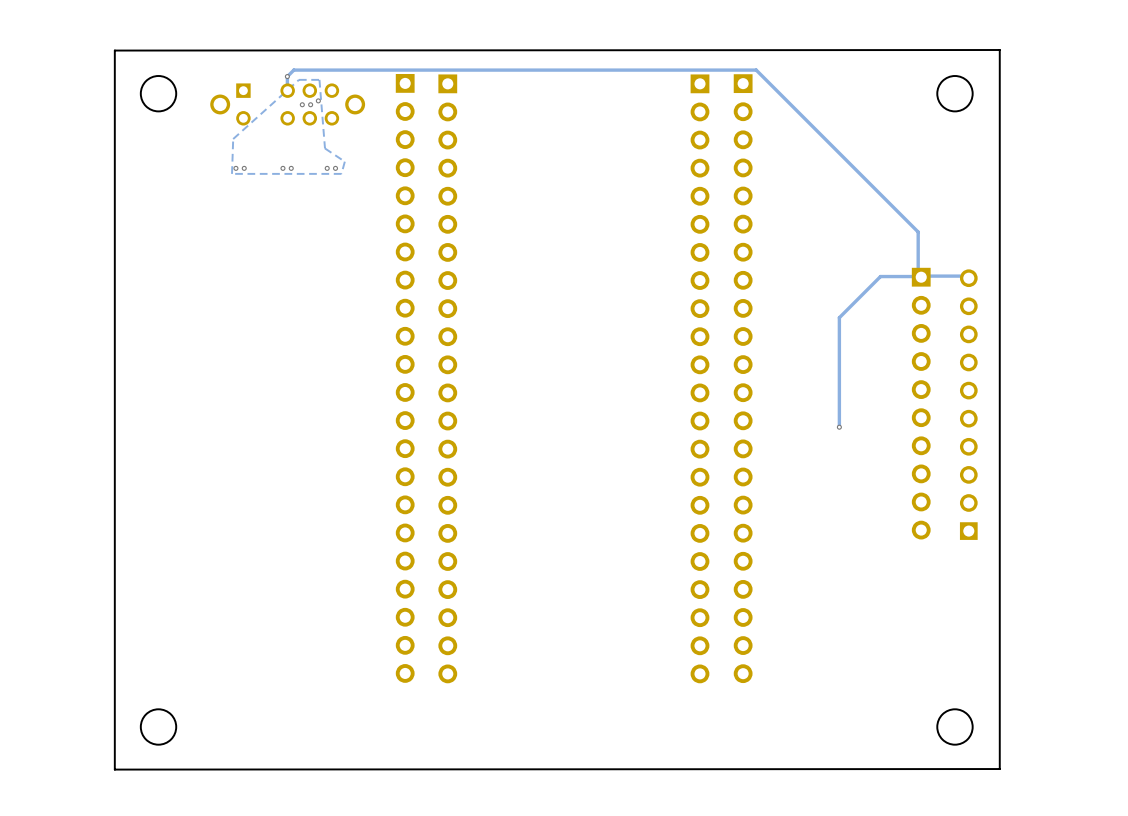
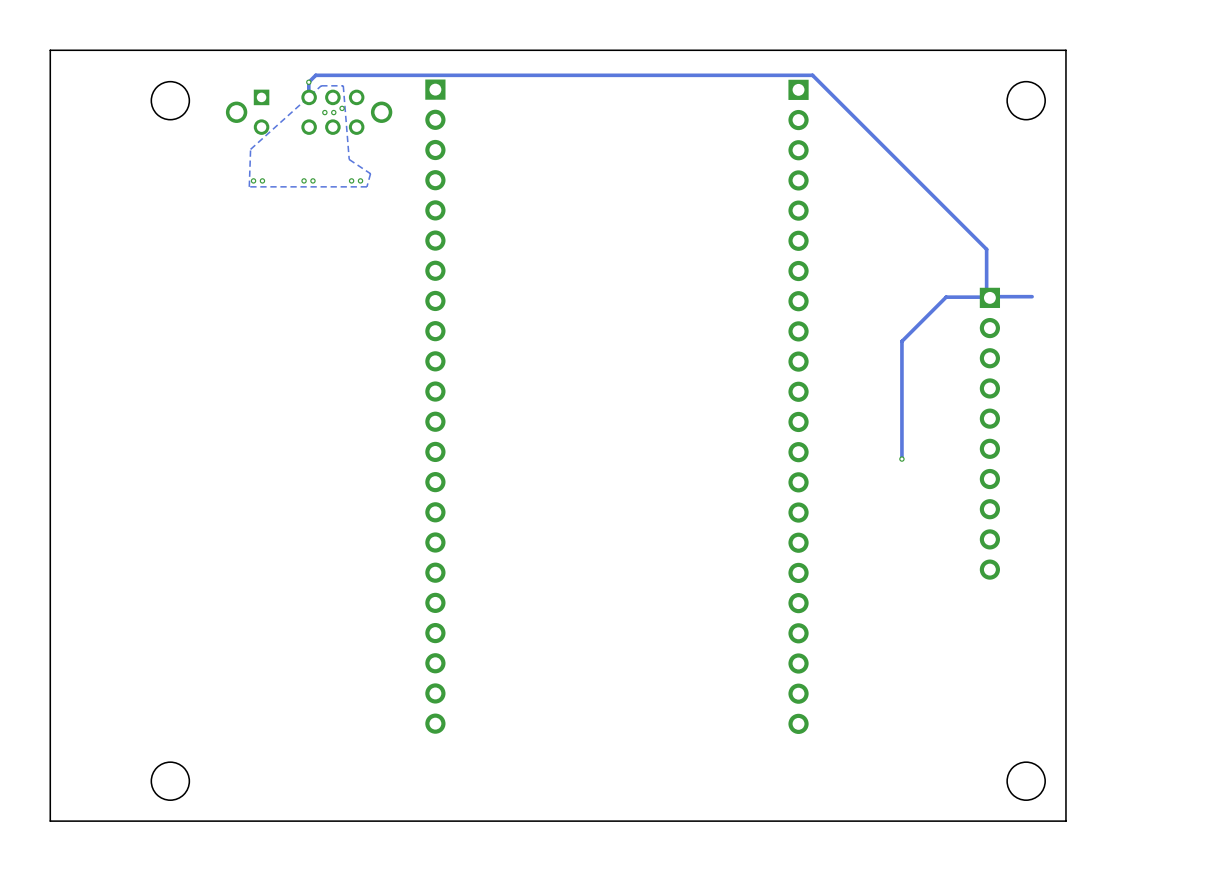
board edge: (999, 50) (999, 769) (114, 769) (114, 50) (999, 50) -> (1065, 50) (1065, 821) (50, 821) (50, 50) (1065, 50)
part: (447, 378) -> none
part: (700, 378) -> none
part: (968, 404) -> none

